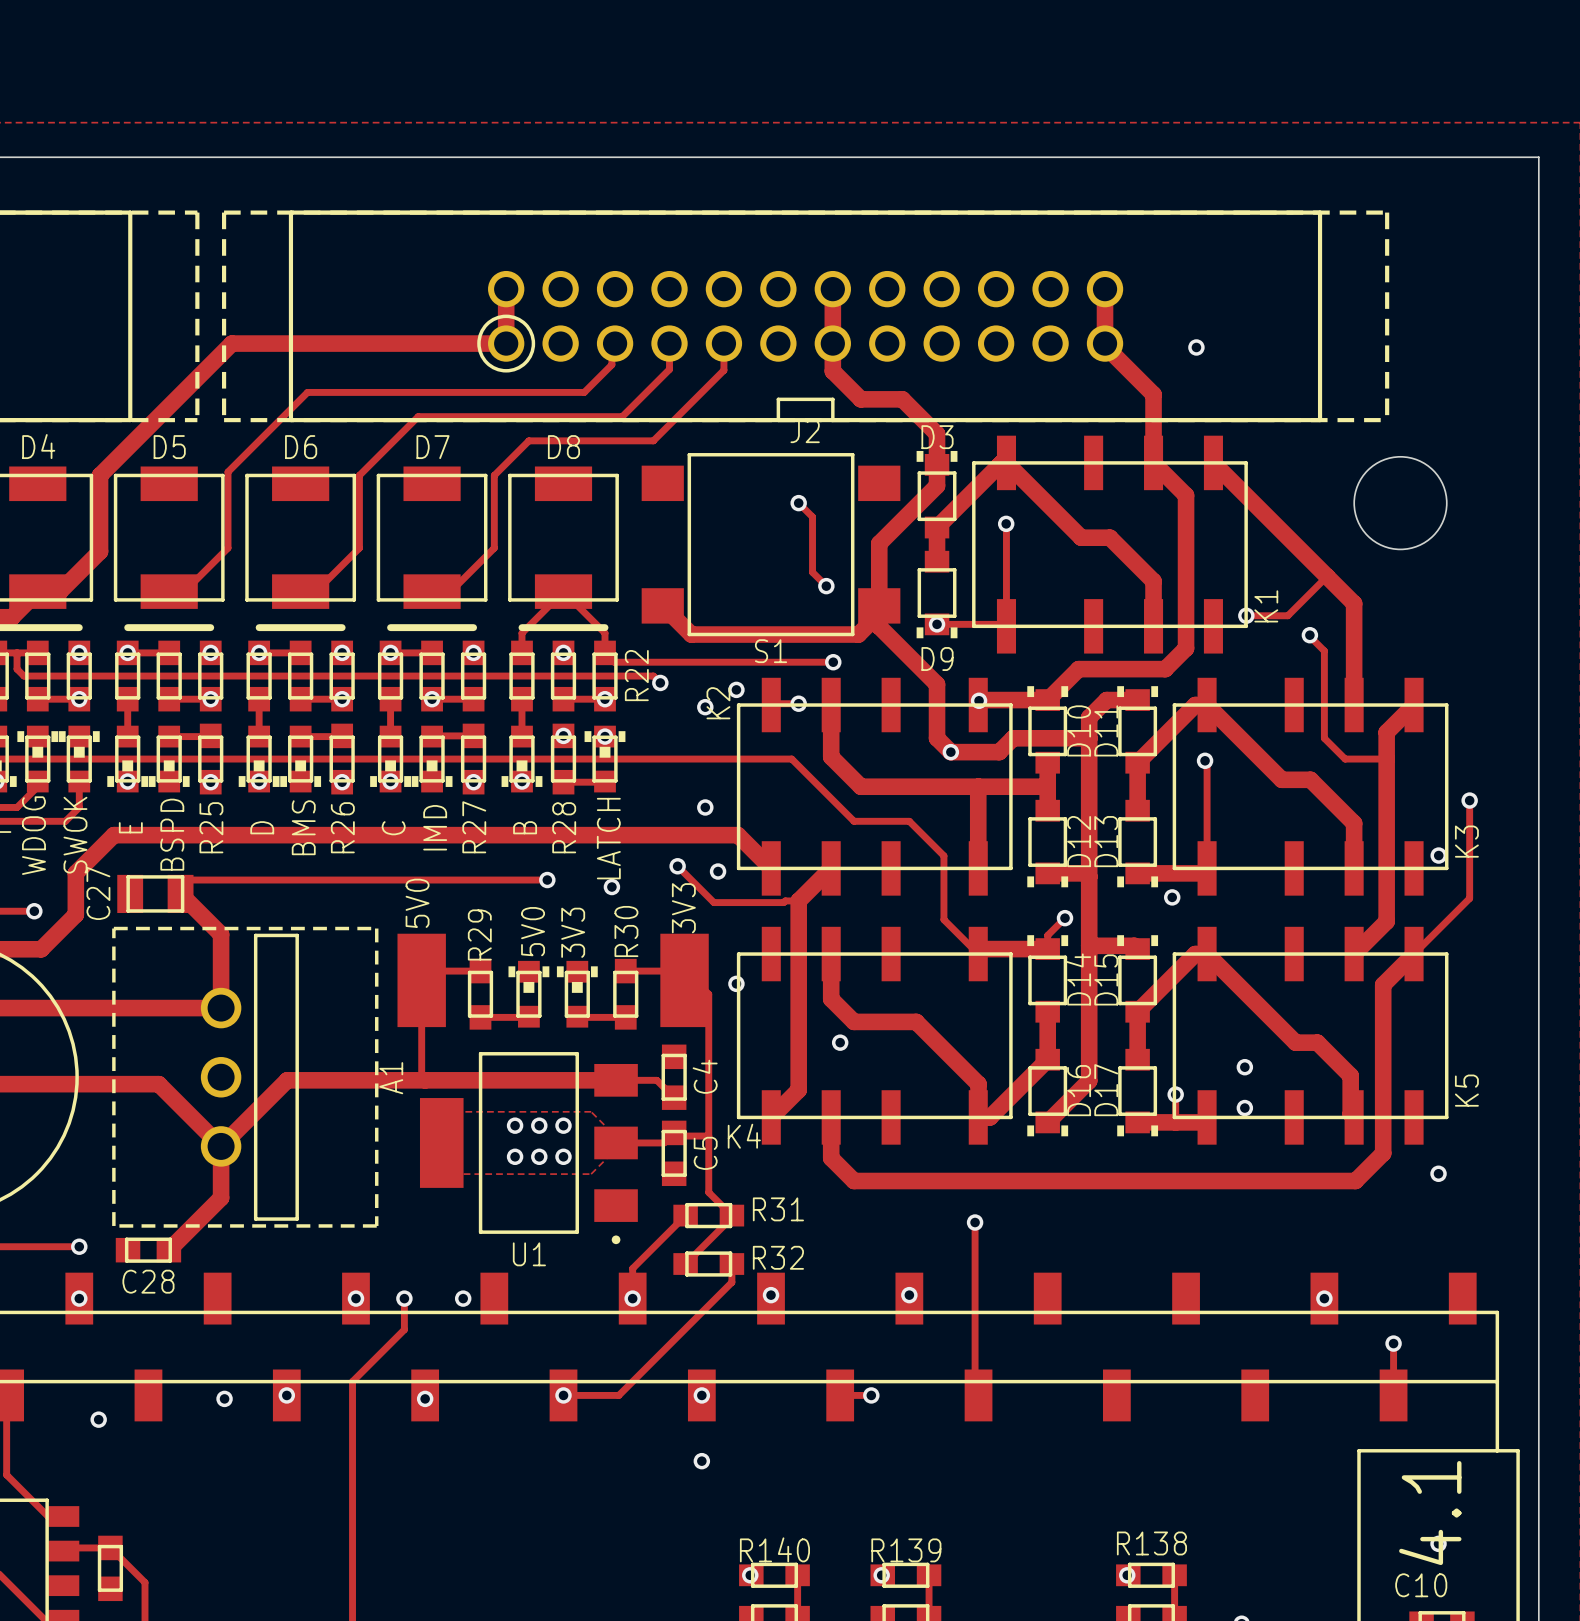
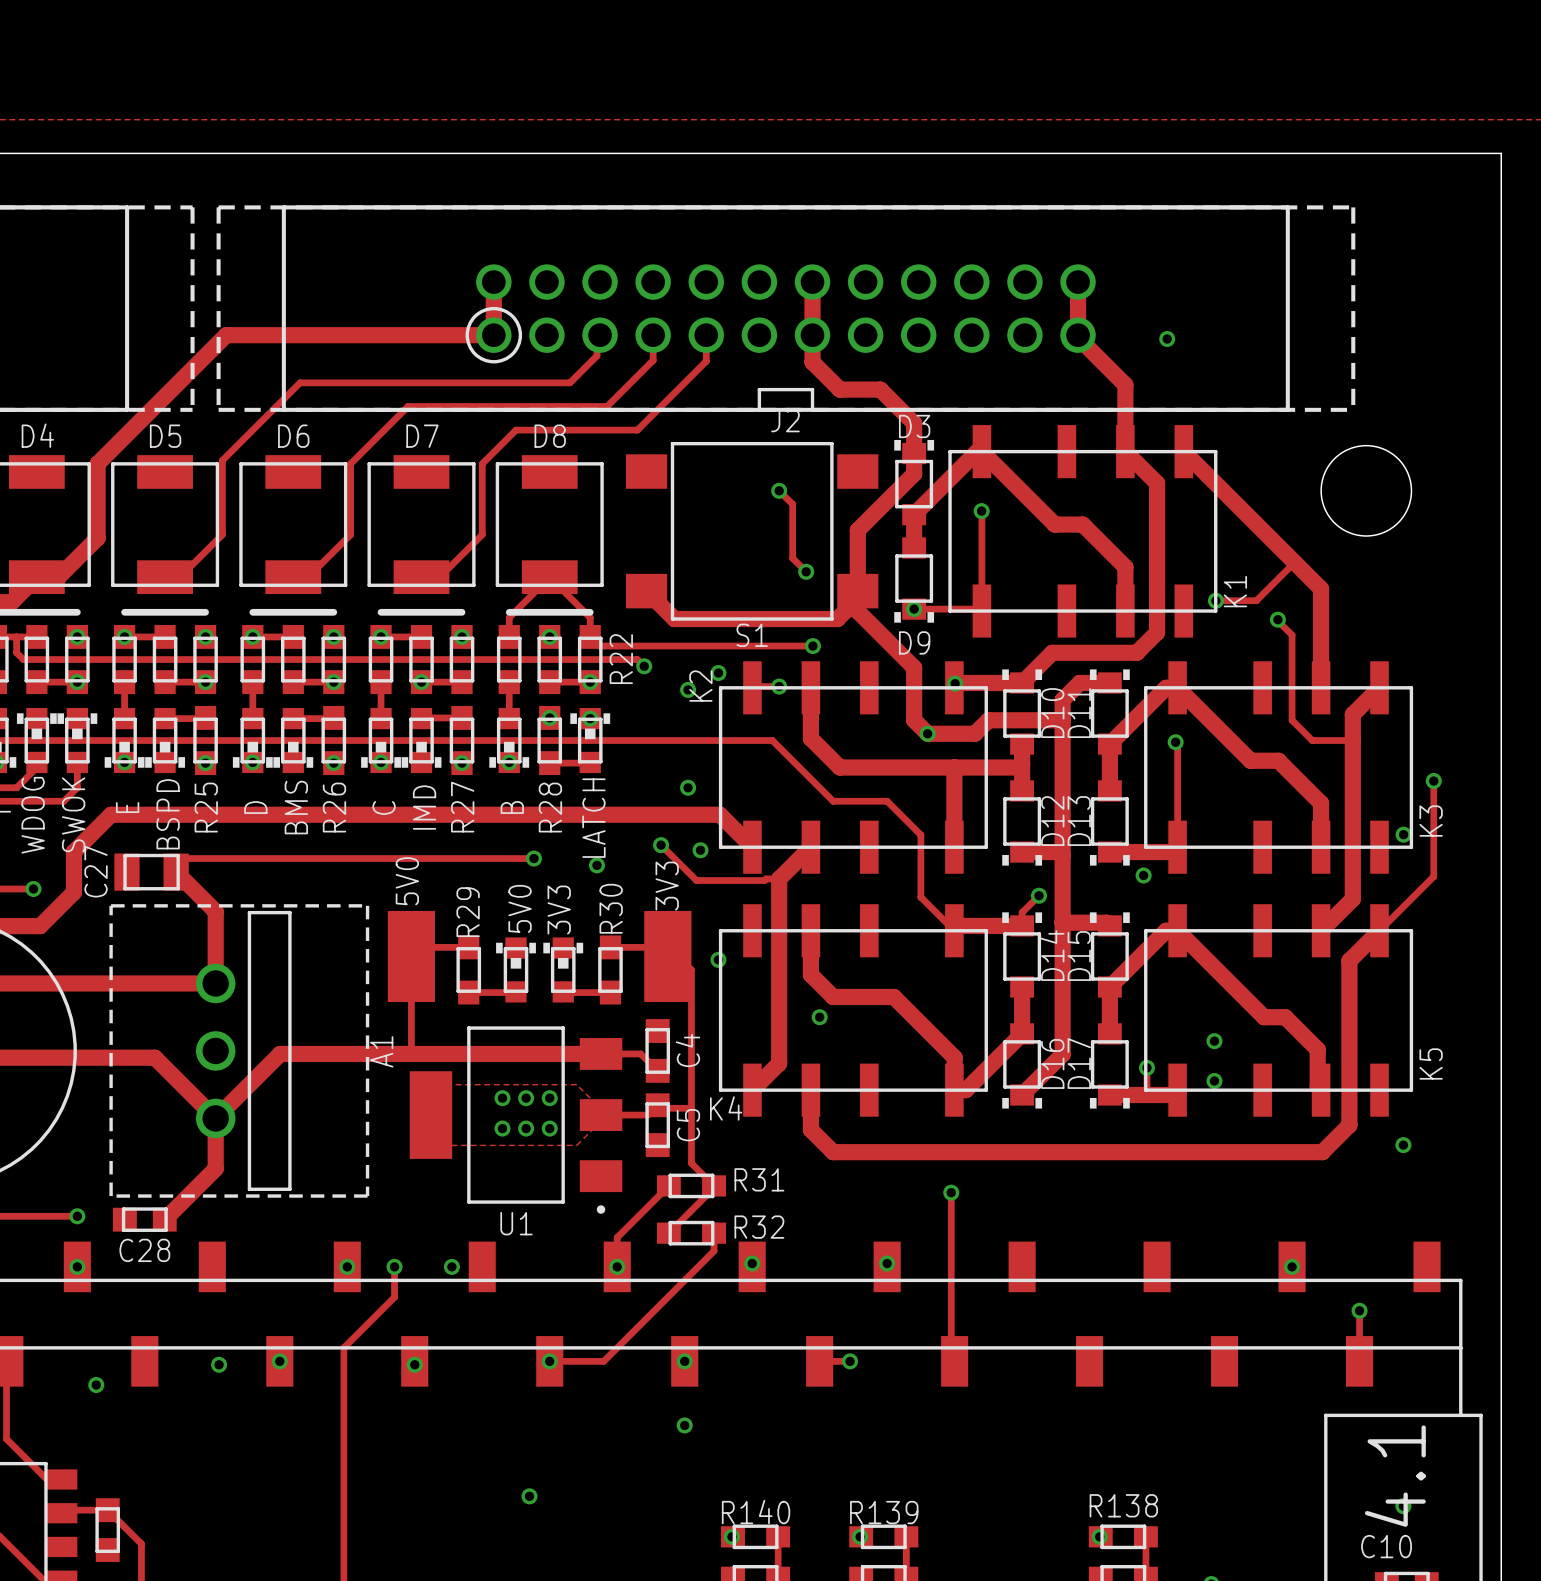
via: none -> (529, 1496)

